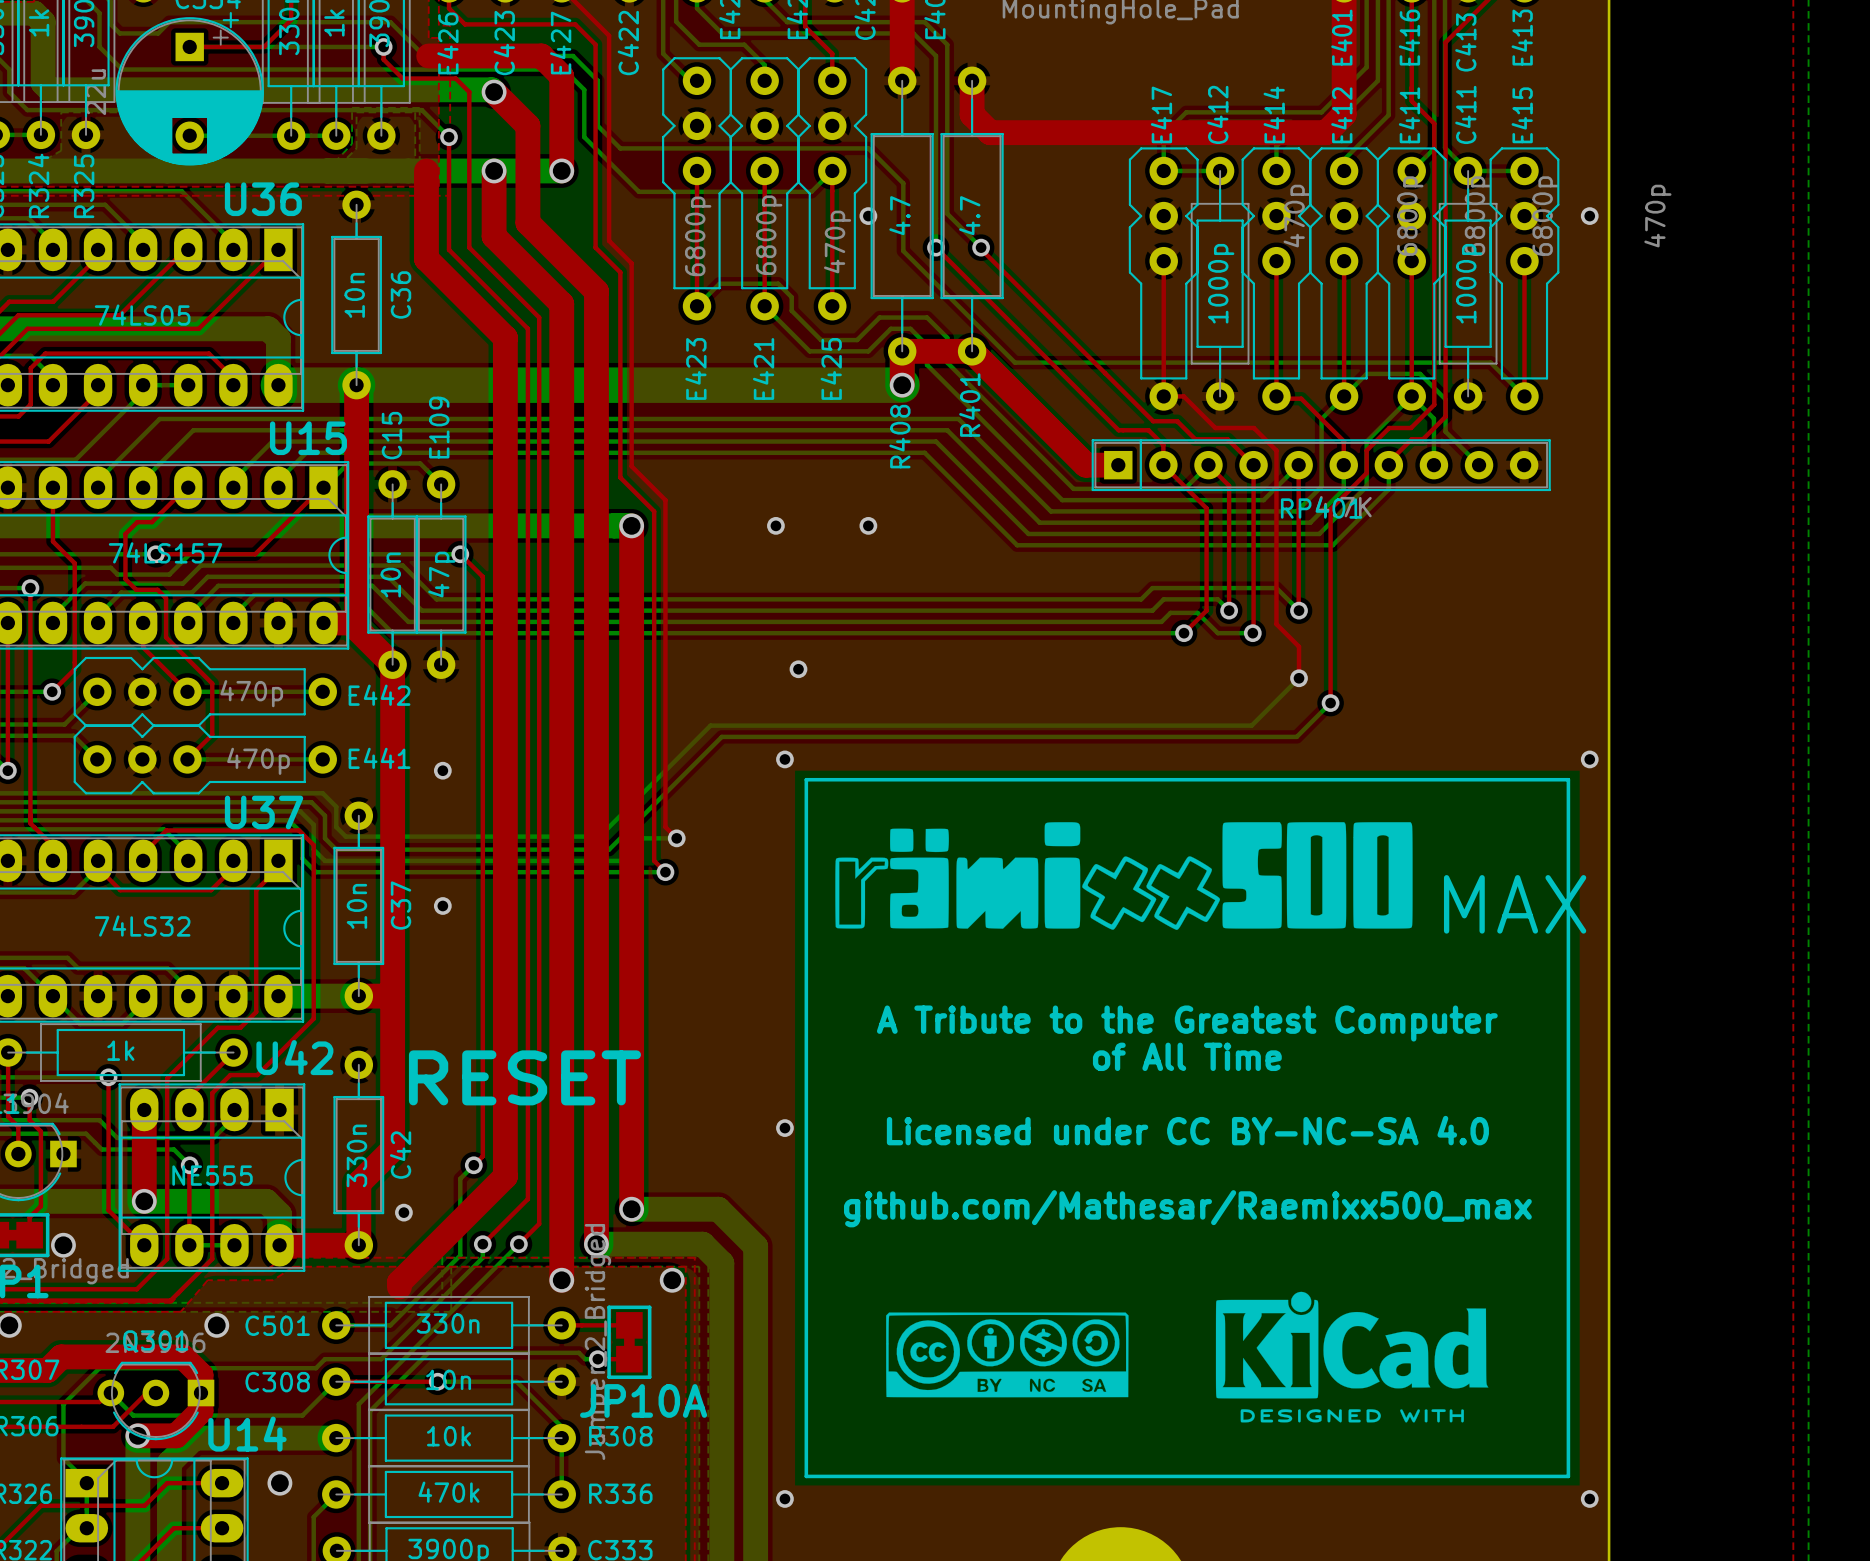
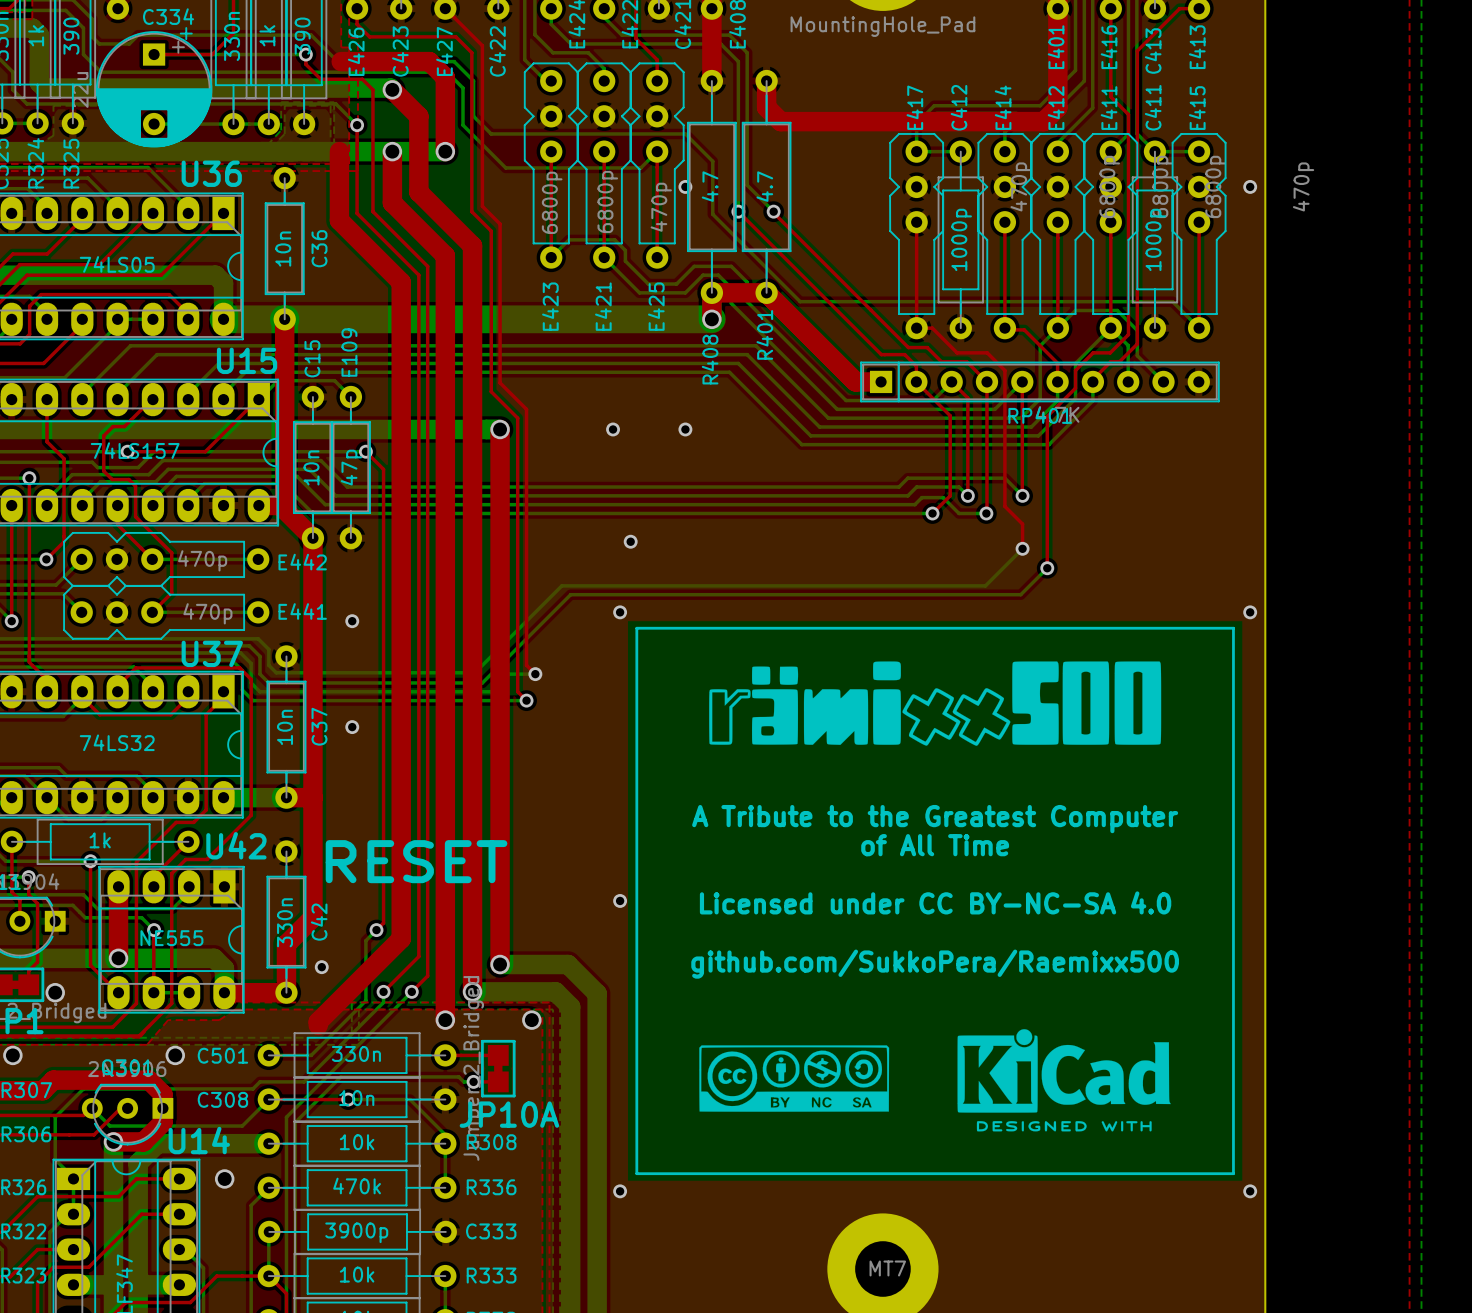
drawing position: (1123, 876) -> (935, 703)
text: MAX (1515, 904) -> none
text: github.com/Mathesar/Raemixx500_max (1187, 1208) -> github.com/SukkoPera/Raemixx500 (935, 964)

